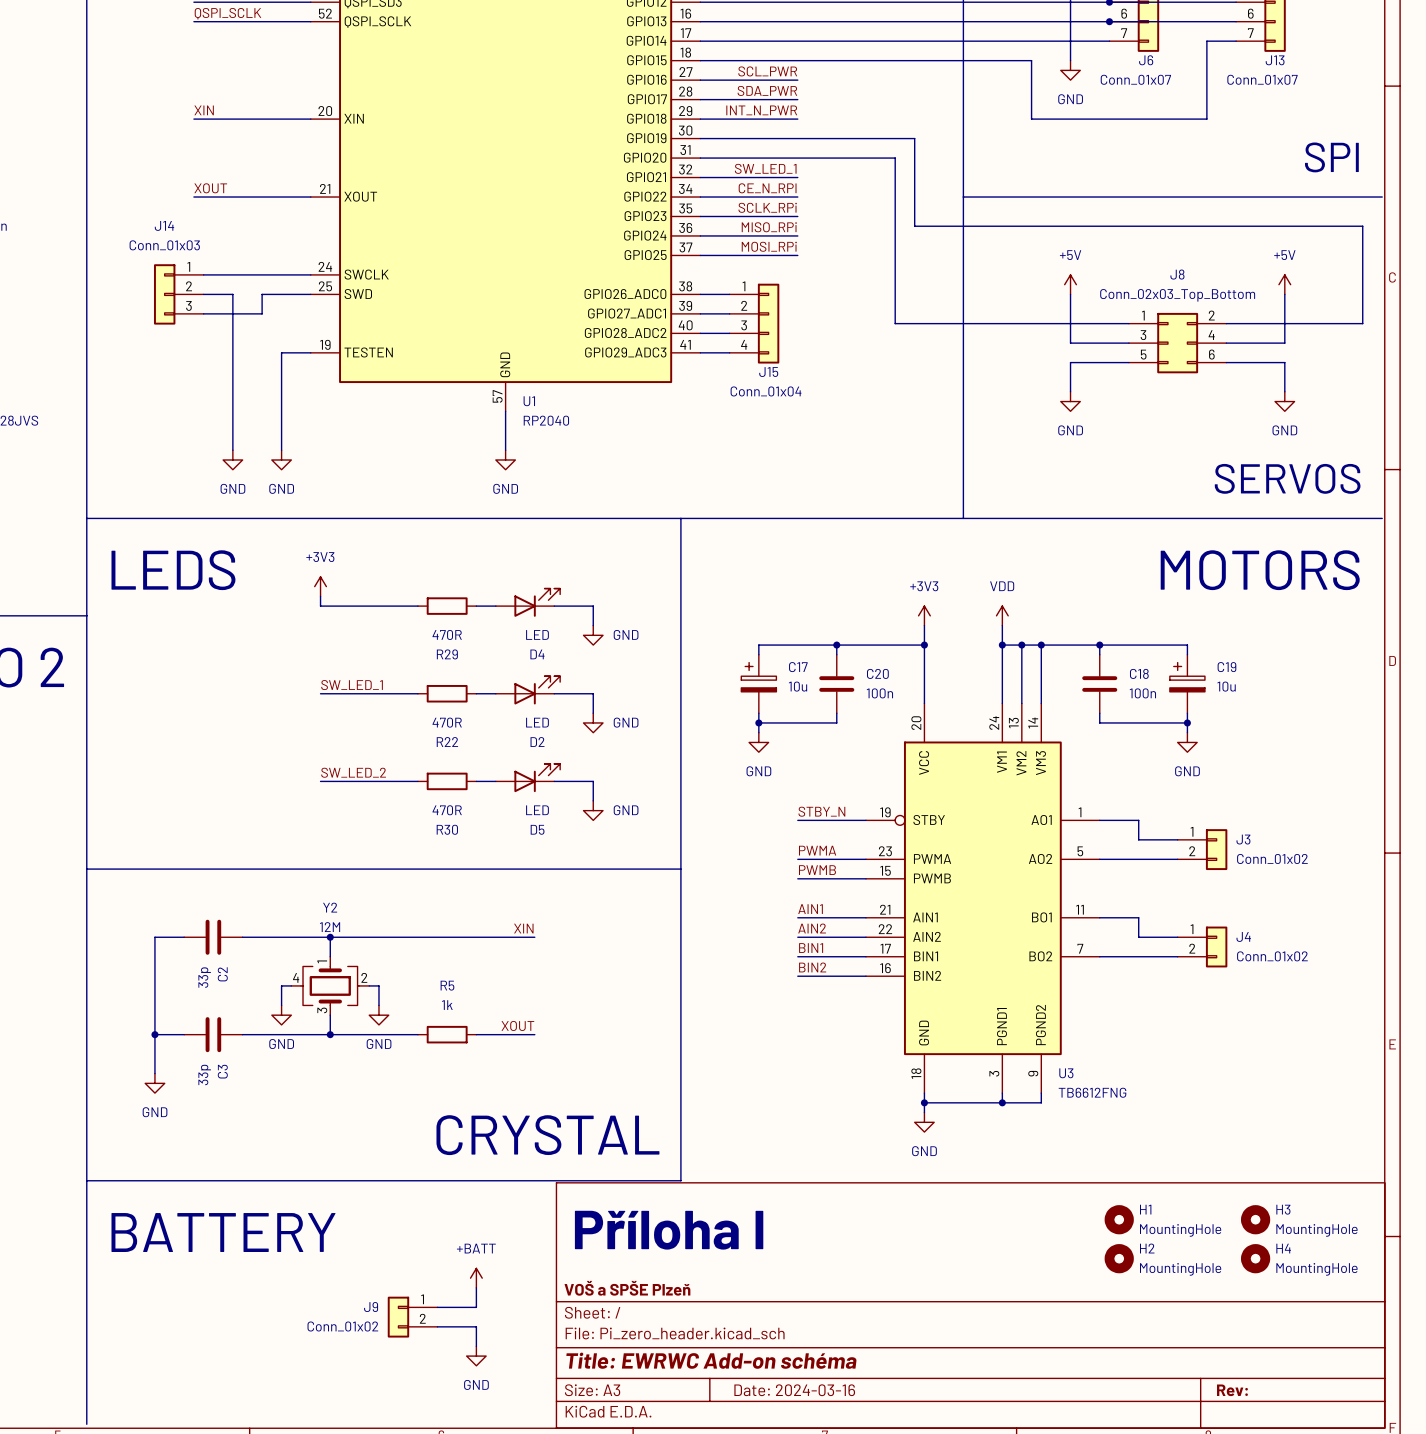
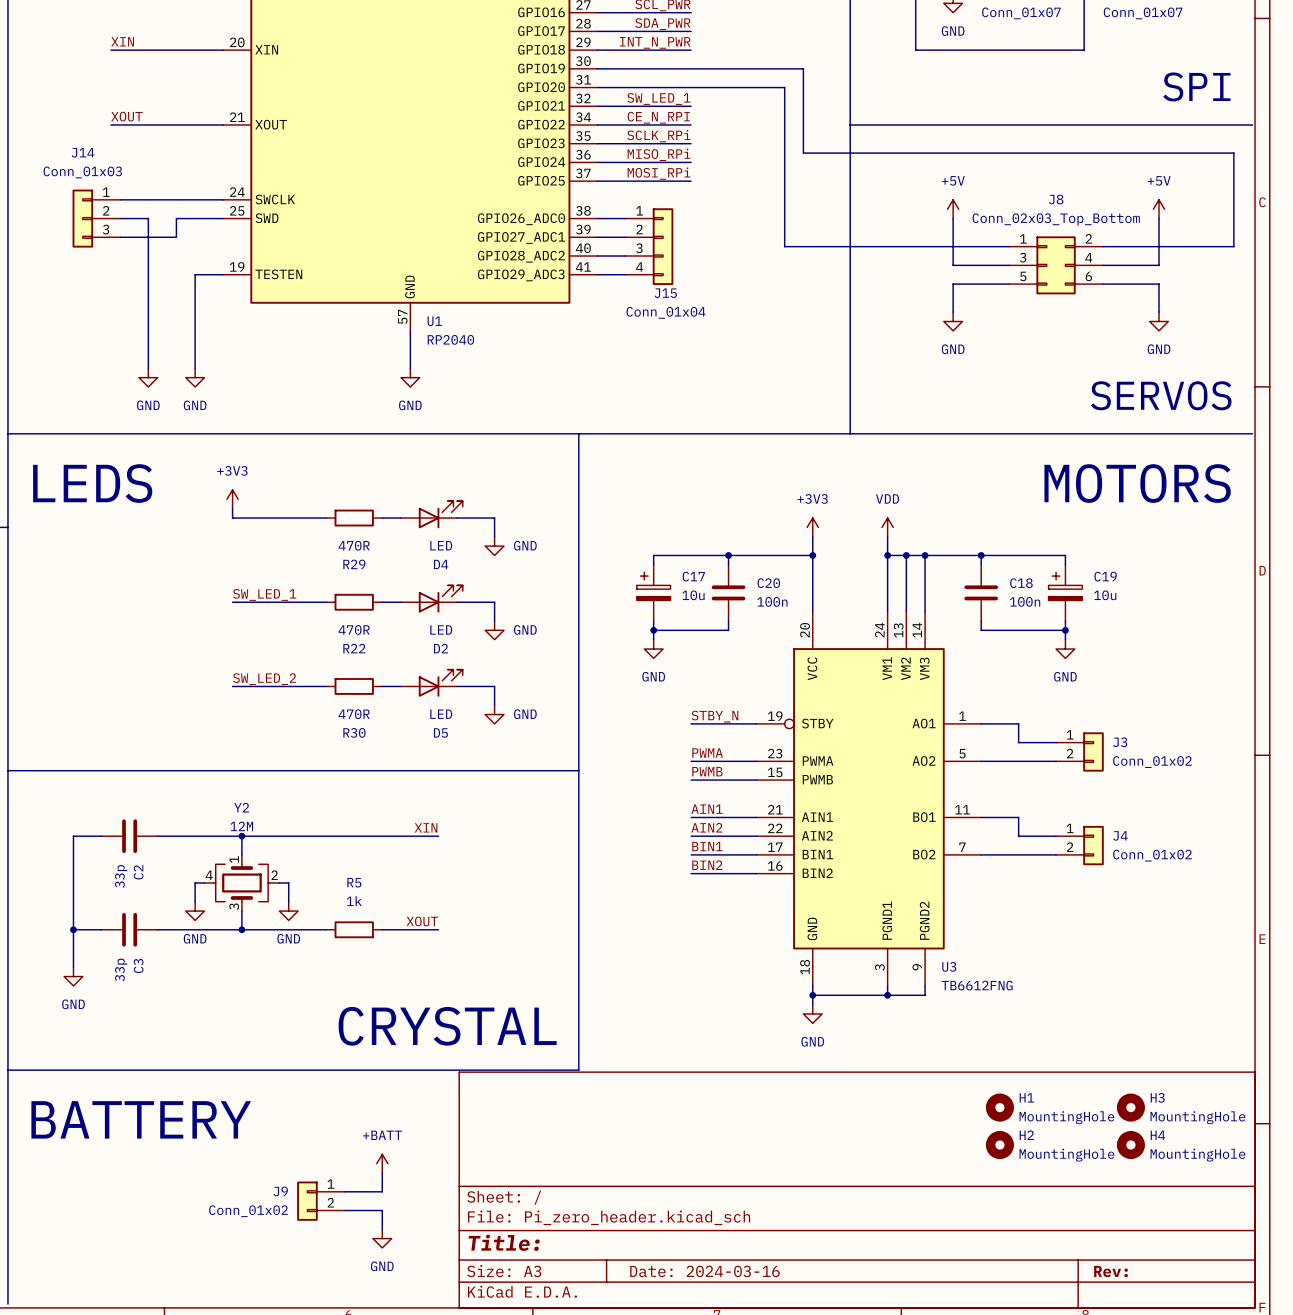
text: Příloha I (669, 1230) -> none
title block: VOŠ a SPŠE Plzeň (627, 1288) -> none
title block: Title: EWRWC Add-on schéma (711, 1360) -> Title: (504, 1242)

